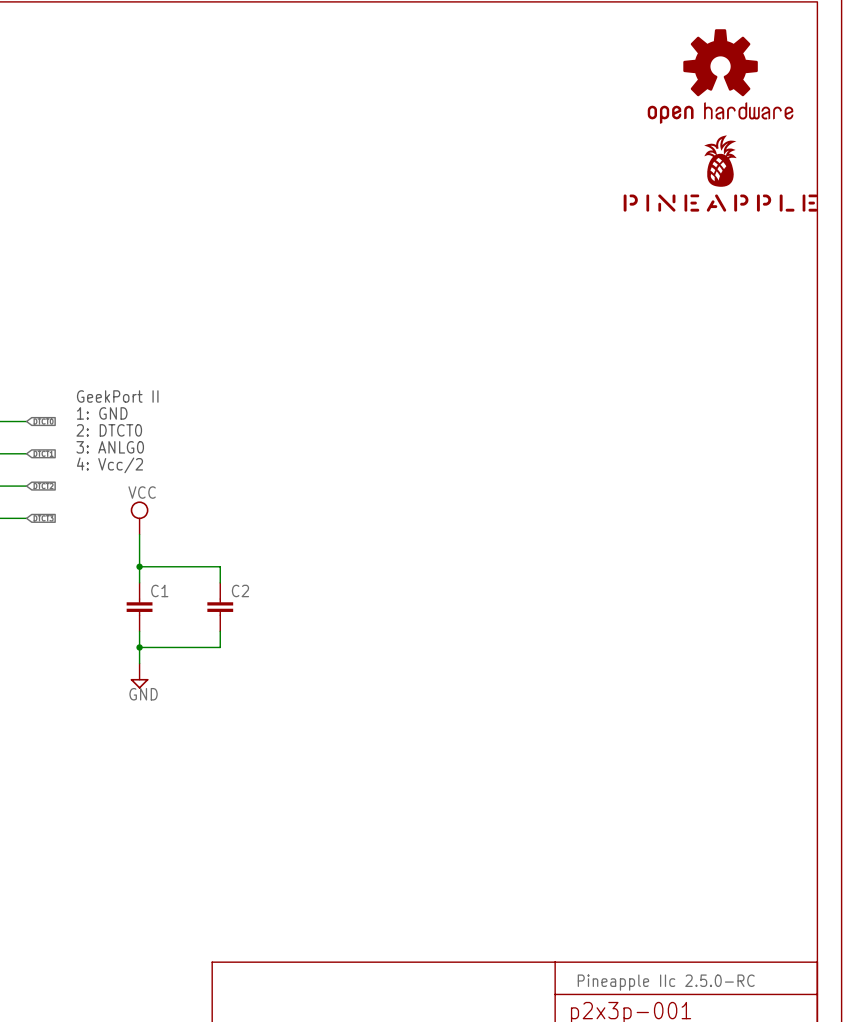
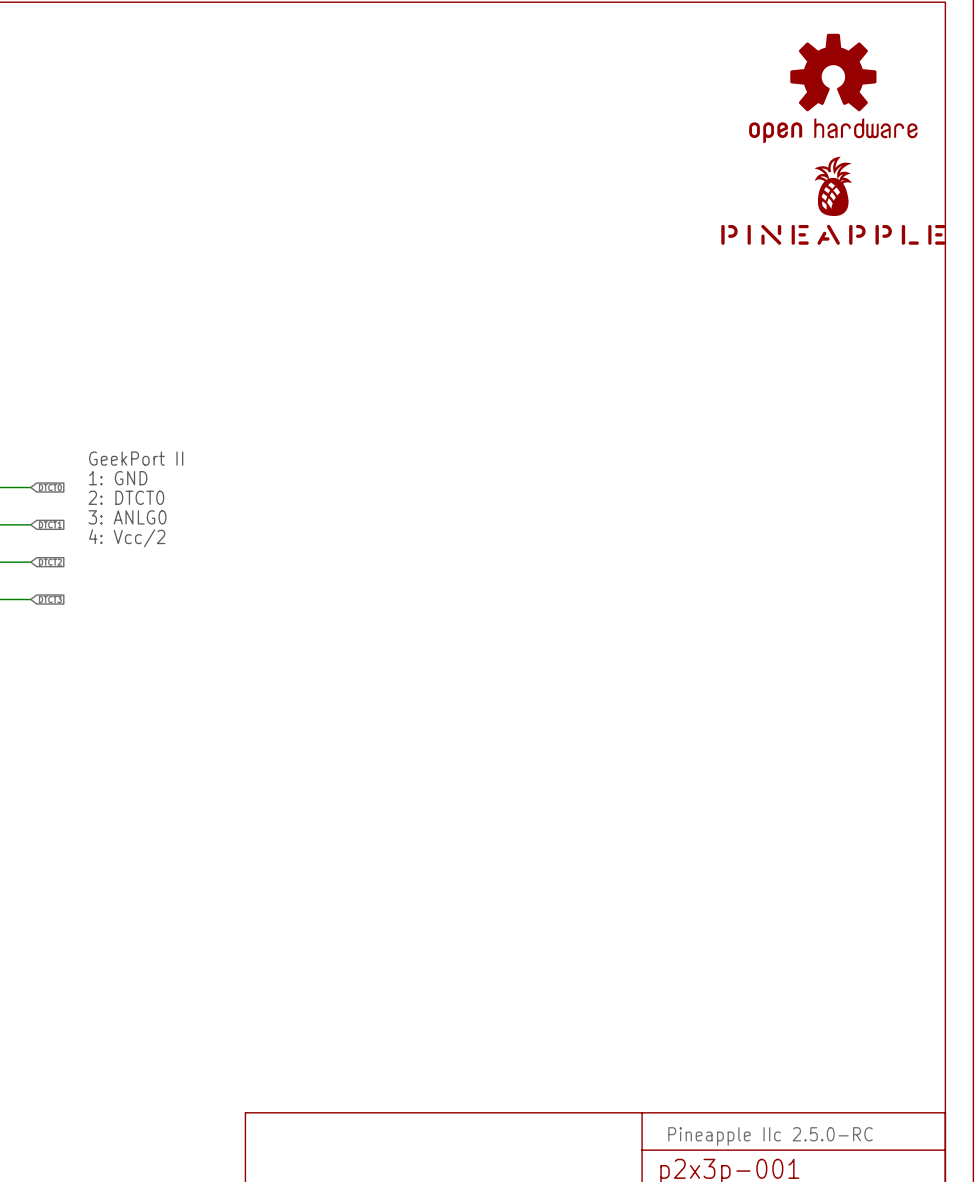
power symbol: VCC (139, 517) -> none
wire: (139, 534) (139, 582) -> none
wire: (139, 566) (220, 566) (220, 582) -> none
junction: (139, 566) -> none
C1: (139, 607) -> none
C2: (220, 607) -> none
wire: (139, 631) (139, 663) -> none
wire: (220, 631) (220, 647) (139, 647) -> none
junction: (139, 647) -> none
power symbol: GND (139, 676) -> none

